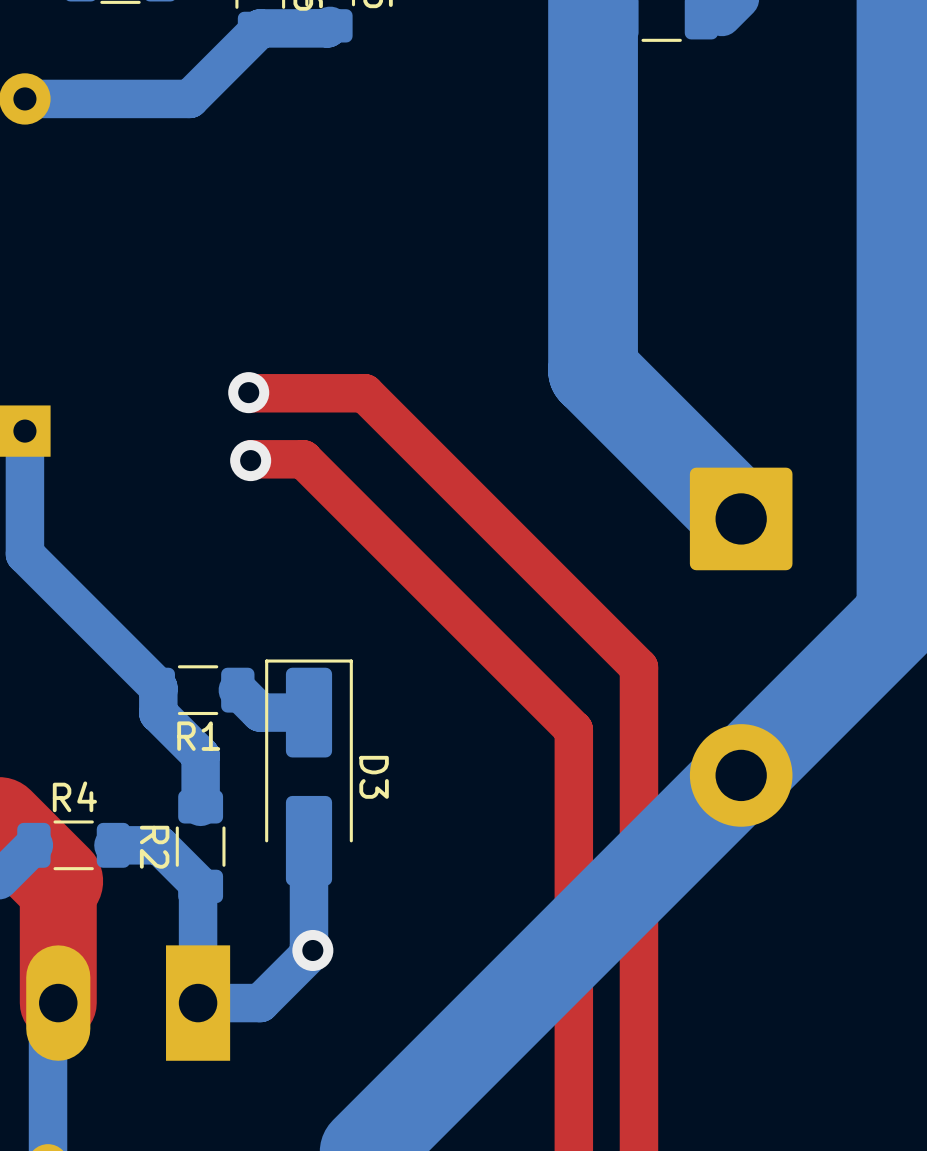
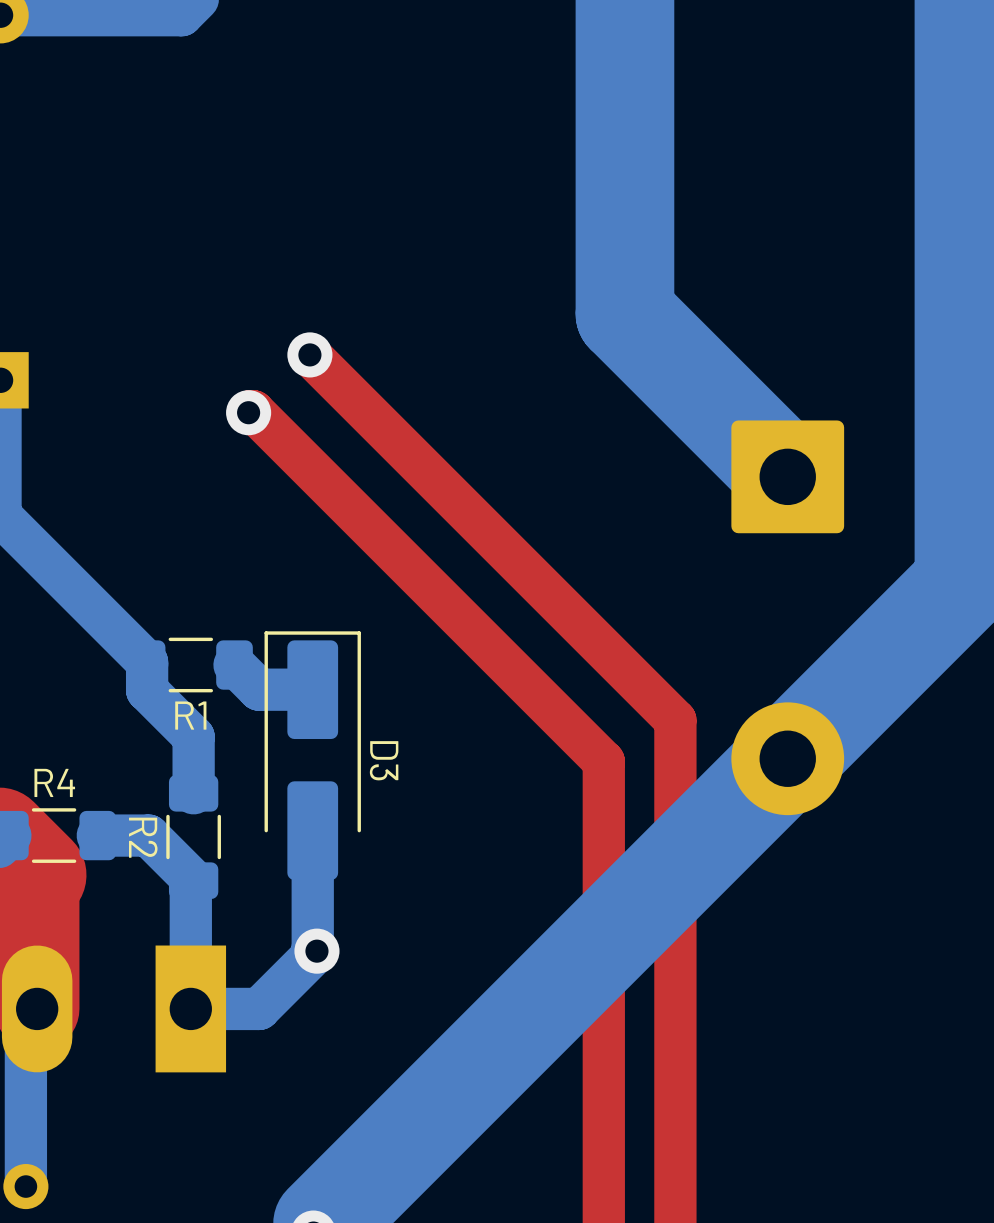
top track: (248, 392) (364, 393) (638, 667) (638, 740) -> (309, 354) (675, 720)
via position: (248, 392) -> (309, 354)
top track: (255, 459) (303, 459) (573, 729) (573, 778) -> (253, 411) (603, 761)

